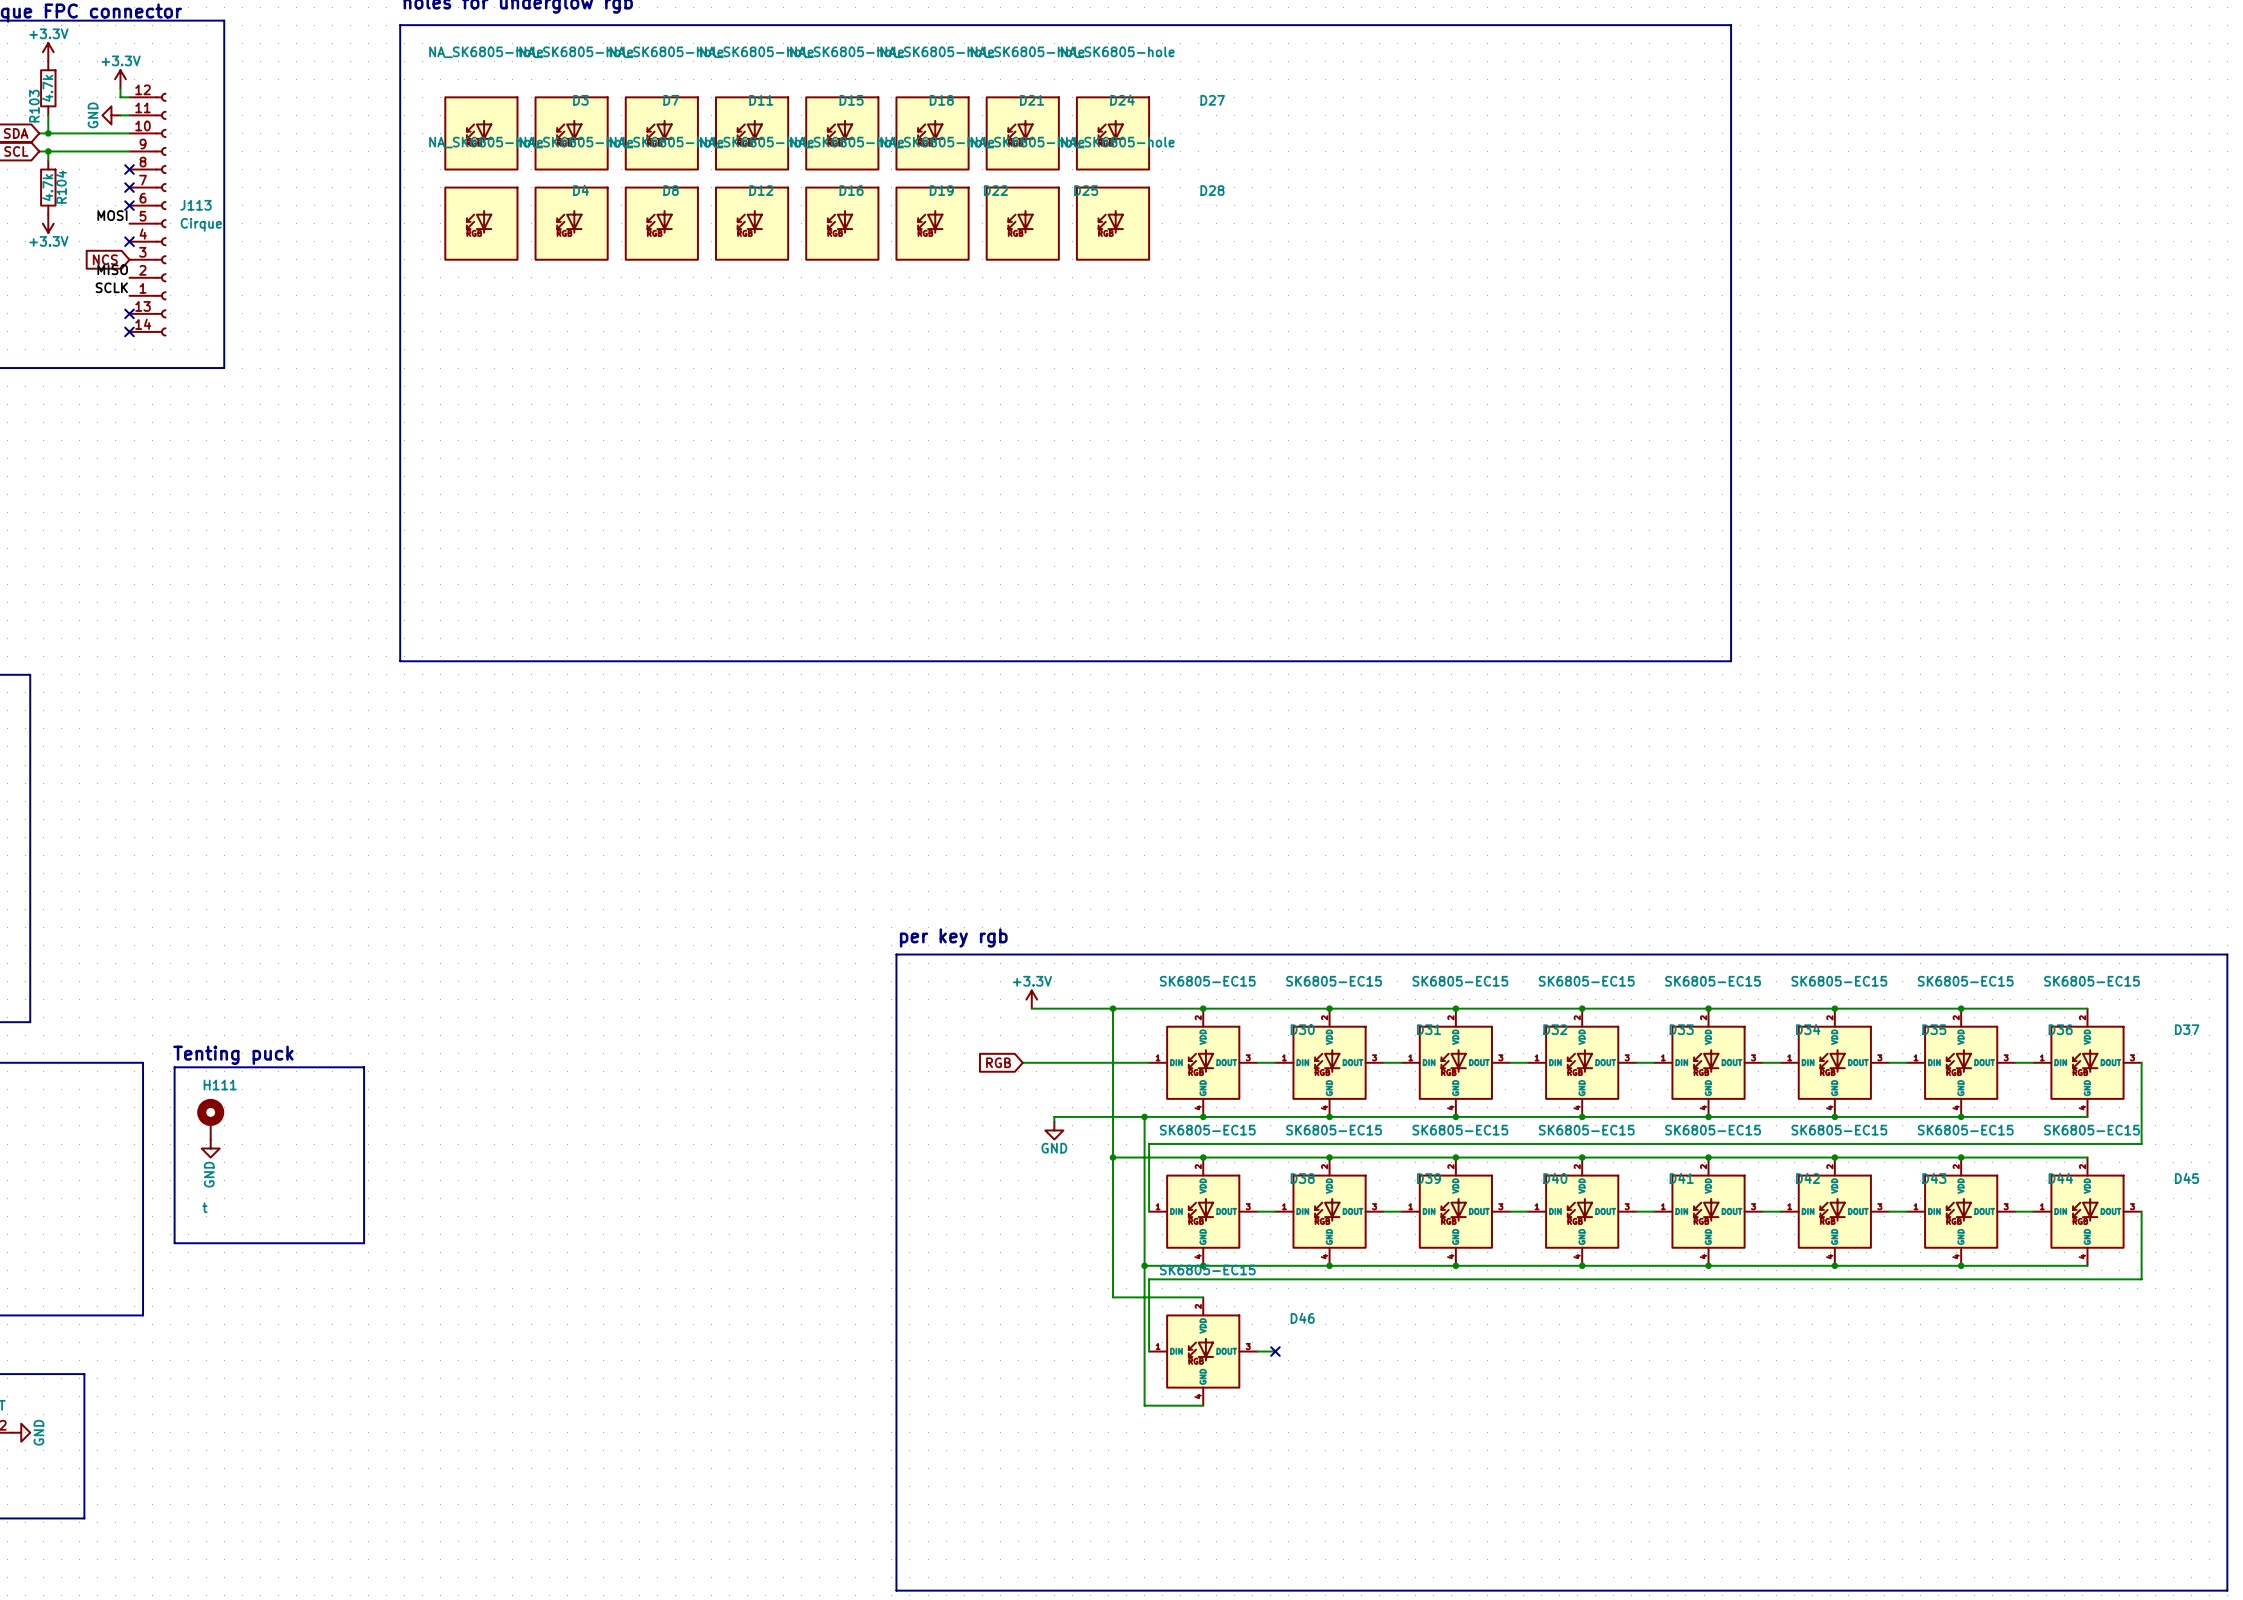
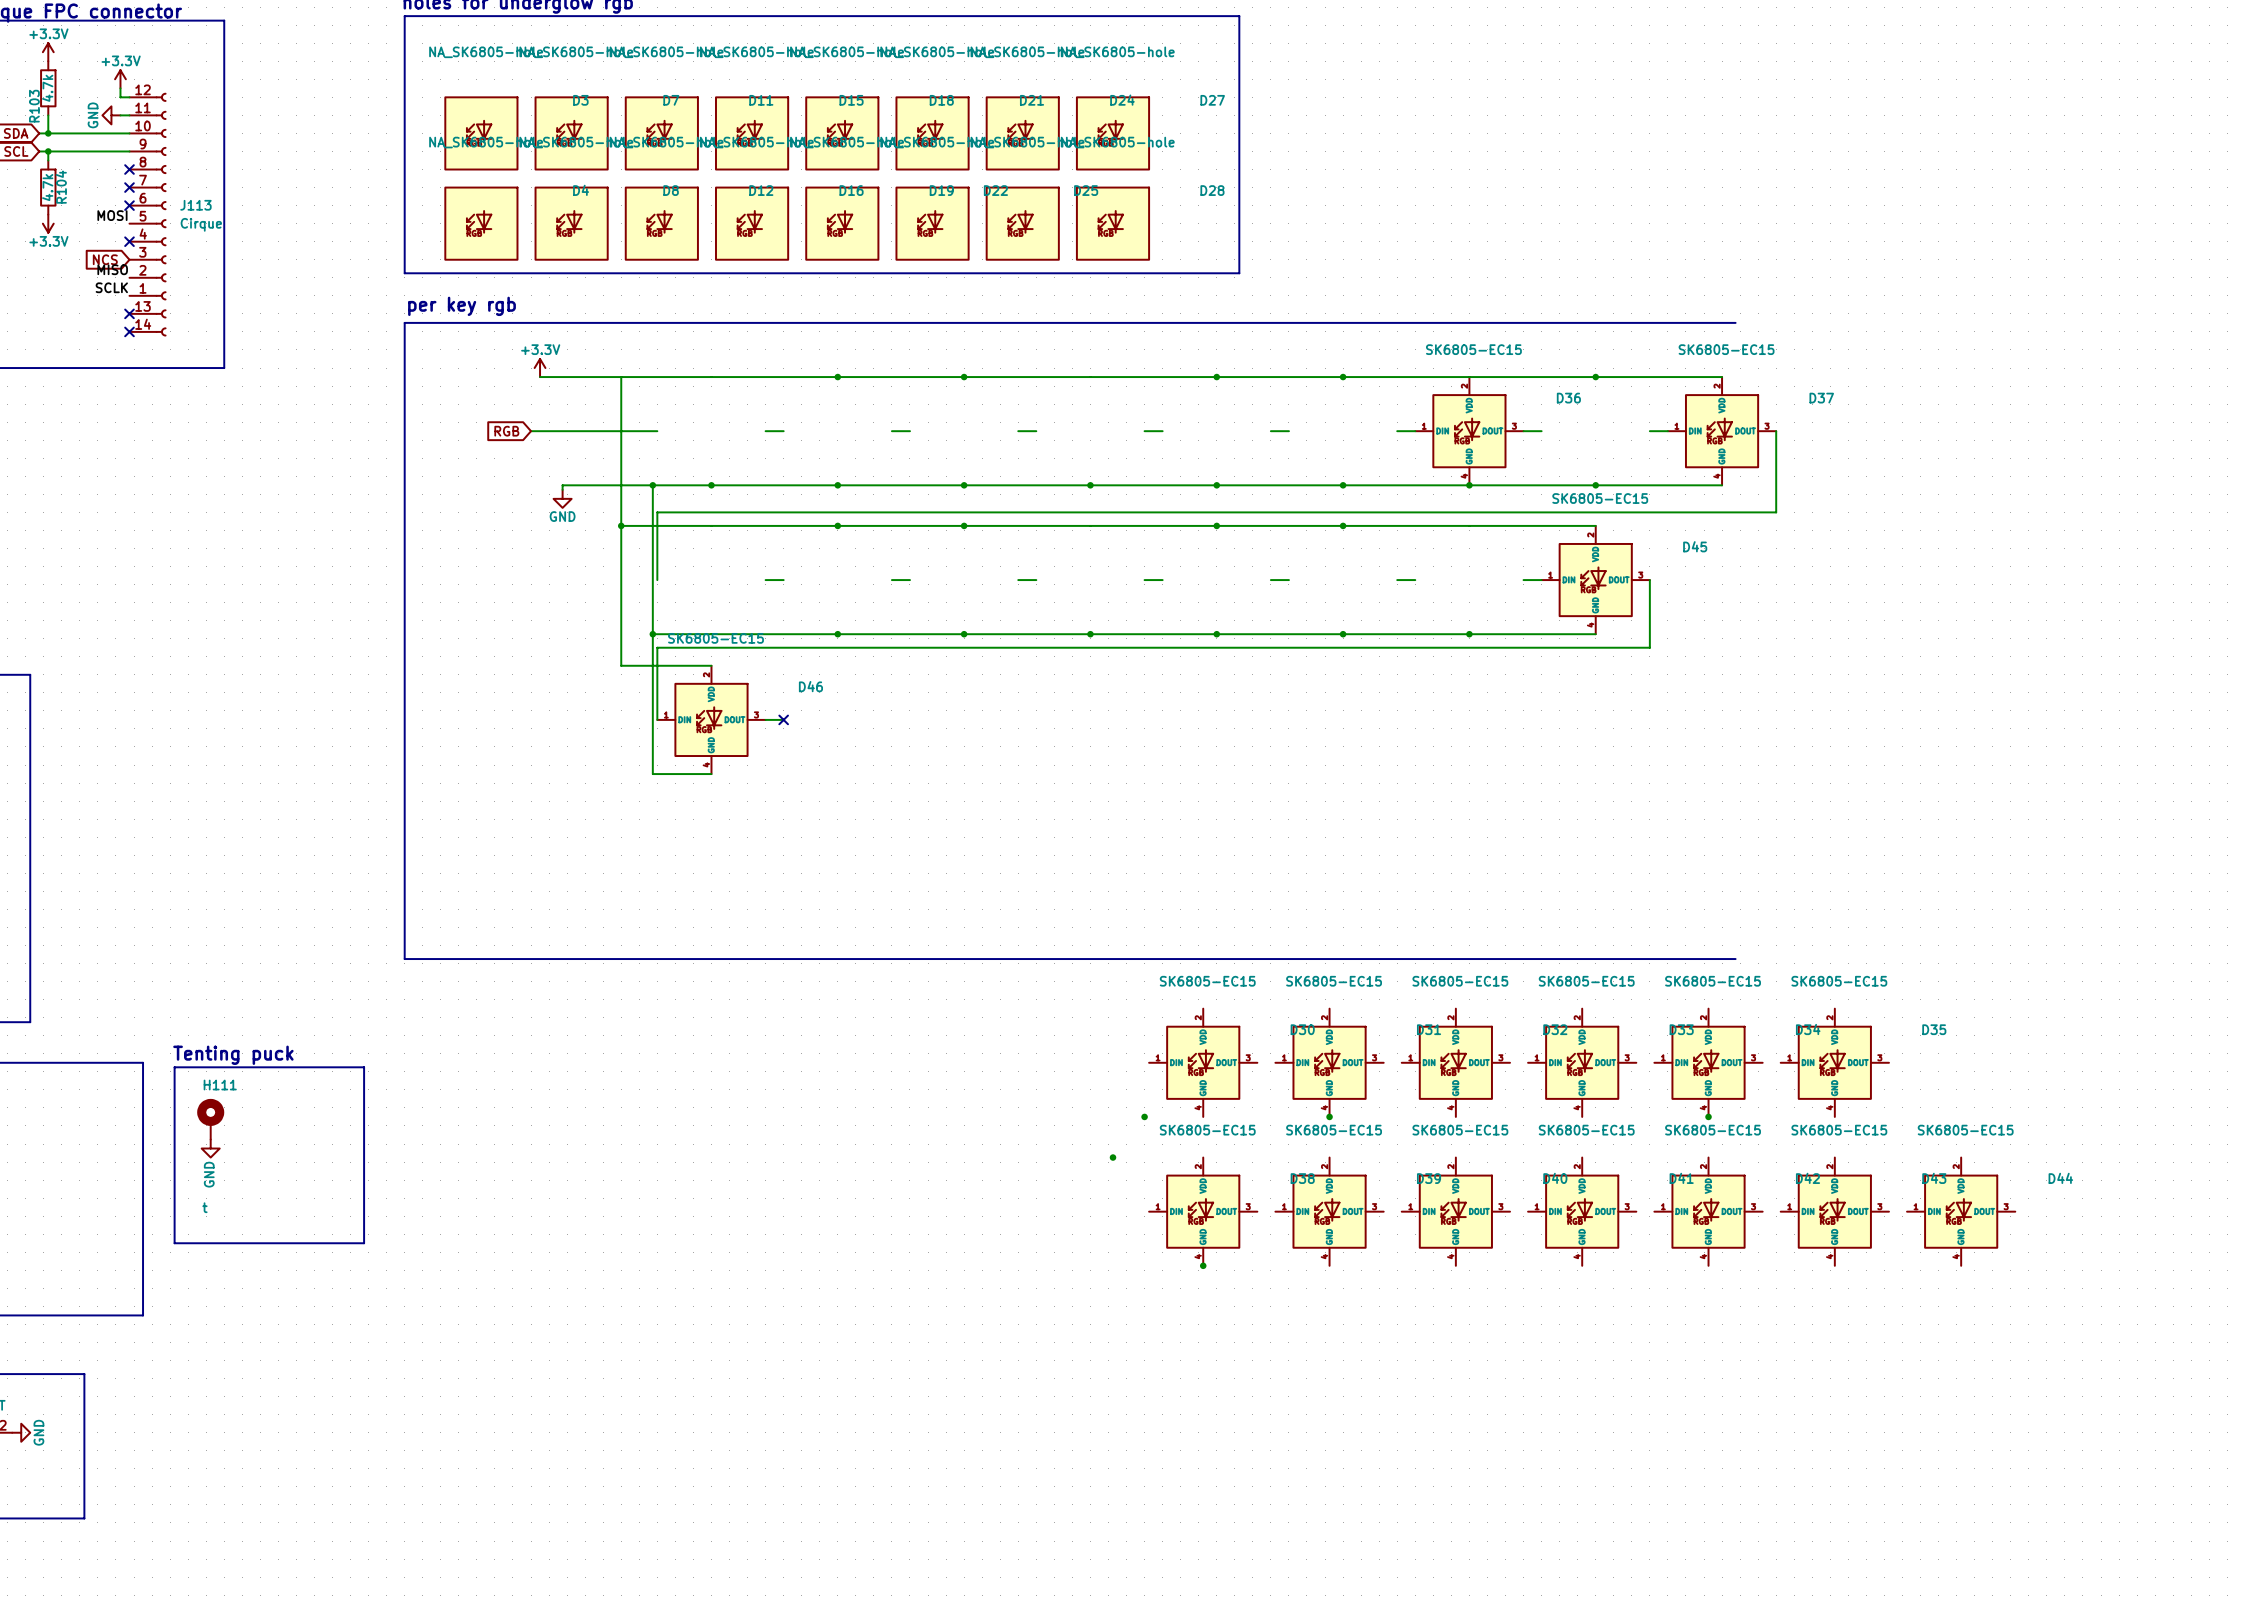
line: none -> (404, 16) (404, 273) (1239, 273) (1239, 16) (404, 16)
line: (400, 25) (1731, 25) (1731, 661) (400, 661) (400, 25) -> none
text: none -> per key rgb (462, 306)
line: none -> (1735, 322) (404, 322) (404, 959) (1735, 959)
power symbol: none -> +3.3V (540, 368)
wire: none -> (540, 377) (1722, 377)
wire: none -> (621, 377) (621, 665) (711, 665)
junction: none -> (837, 377)
junction: none -> (964, 377)
junction: none -> (1216, 377)
junction: none -> (1343, 377)
junction: none -> (1595, 377)
global label: none -> RGB (506, 431)
wire: none -> (531, 431) (657, 431)
wire: none -> (765, 431) (783, 431)
wire: none -> (891, 431) (909, 431)
wire: none -> (1018, 431) (1036, 431)
wire: none -> (1144, 431) (1162, 431)
wire: none -> (1270, 431) (1288, 431)
wire: none -> (1397, 431) (1415, 431)
wire: none -> (1523, 431) (1541, 431)
wire: none -> (1649, 431) (1667, 431)
wire: none -> (1776, 431) (1776, 512) (657, 512) (657, 580)
wire: none -> (652, 485) (652, 774) (711, 774)
junction: none -> (652, 485)
junction: none -> (711, 485)
junction: none -> (837, 485)
junction: none -> (964, 485)
junction: none -> (1090, 485)
junction: none -> (1216, 485)
junction: none -> (1343, 485)
junction: none -> (1469, 485)
junction: none -> (1595, 485)
wire: none -> (1722, 485) (562, 485) (562, 489)
power symbol: none -> GND (562, 498)
wire: none -> (621, 525) (1595, 525)
junction: none -> (621, 525)
junction: none -> (837, 525)
junction: none -> (964, 525)
junction: none -> (1216, 525)
junction: none -> (1343, 525)
wire: none -> (765, 580) (783, 580)
wire: none -> (891, 580) (909, 580)
wire: none -> (1018, 580) (1036, 580)
wire: none -> (1144, 580) (1162, 580)
wire: none -> (1270, 580) (1288, 580)
wire: none -> (1397, 580) (1415, 580)
wire: none -> (1523, 580) (1541, 580)
wire: none -> (1649, 580) (1649, 647) (657, 647) (657, 719)
wire: none -> (652, 634) (1595, 634)
junction: none -> (652, 634)
junction: none -> (837, 634)
junction: none -> (964, 634)
junction: none -> (1090, 634)
junction: none -> (1216, 634)
junction: none -> (1343, 634)
junction: none -> (1469, 634)
wire: none -> (765, 719) (783, 719)
no-connect mark: none -> (783, 719)
text: per key rgb (953, 937) -> none
line: (896, 954) (896, 1590) (2227, 1590) (2227, 954) (896, 954) -> none
power symbol: +3.3V (1031, 999) -> none
wire: (1031, 1008) (2087, 1008) -> none
wire: (1113, 1008) (1113, 1297) (1203, 1297) -> none
junction: (1113, 1008) -> none
junction: (1203, 1008) -> none
junction: (1329, 1008) -> none
junction: (1455, 1008) -> none
junction: (1582, 1008) -> none
junction: (1708, 1008) -> none
junction: (1834, 1008) -> none
junction: (1961, 1008) -> none
global label: RGB (998, 1062) -> none
wire: (1022, 1062) (1149, 1062) -> none
wire: (1257, 1062) (1275, 1062) -> none
wire: (1383, 1062) (1401, 1062) -> none
wire: (1510, 1062) (1528, 1062) -> none
wire: (1636, 1062) (1654, 1062) -> none
wire: (1762, 1062) (1780, 1062) -> none
wire: (1888, 1062) (1907, 1062) -> none
D36 position: (1961, 1062) -> (1469, 431)
wire: (2015, 1062) (2033, 1062) -> none
D37 position: (2087, 1062) -> (1722, 431)
wire: (2141, 1062) (2141, 1144) (1149, 1144) (1149, 1211) -> none
wire: (1144, 1116) (1144, 1405) (1203, 1405) -> none
junction: (1203, 1116) -> none
junction: (1455, 1116) -> none
junction: (1582, 1116) -> none
junction: (1834, 1116) -> none
junction: (1961, 1116) -> none
wire: (2087, 1116) (1054, 1116) (1054, 1121) -> none
power symbol: GND (1054, 1130) -> none
wire: (1113, 1157) (2087, 1157) -> none
junction: (1203, 1157) -> none
junction: (1329, 1157) -> none
junction: (1455, 1157) -> none
junction: (1582, 1157) -> none
junction: (1708, 1157) -> none
junction: (1834, 1157) -> none
junction: (1961, 1157) -> none
wire: (1257, 1211) (1275, 1211) -> none
wire: (1383, 1211) (1401, 1211) -> none
wire: (1510, 1211) (1528, 1211) -> none
wire: (1636, 1211) (1654, 1211) -> none
wire: (1762, 1211) (1780, 1211) -> none
wire: (1888, 1211) (1907, 1211) -> none
wire: (2015, 1211) (2033, 1211) -> none
D45 position: (2087, 1211) -> (1595, 580)
wire: (2141, 1211) (2141, 1279) (1149, 1279) (1149, 1351) -> none
wire: (1144, 1265) (2087, 1265) -> none
junction: (1144, 1265) -> none
junction: (1329, 1265) -> none
junction: (1455, 1265) -> none
junction: (1582, 1265) -> none
junction: (1708, 1265) -> none
junction: (1834, 1265) -> none
junction: (1961, 1265) -> none
D46 position: (1203, 1351) -> (711, 719)
wire: (1257, 1351) (1275, 1351) -> none
no-connect mark: (1275, 1351) -> none

